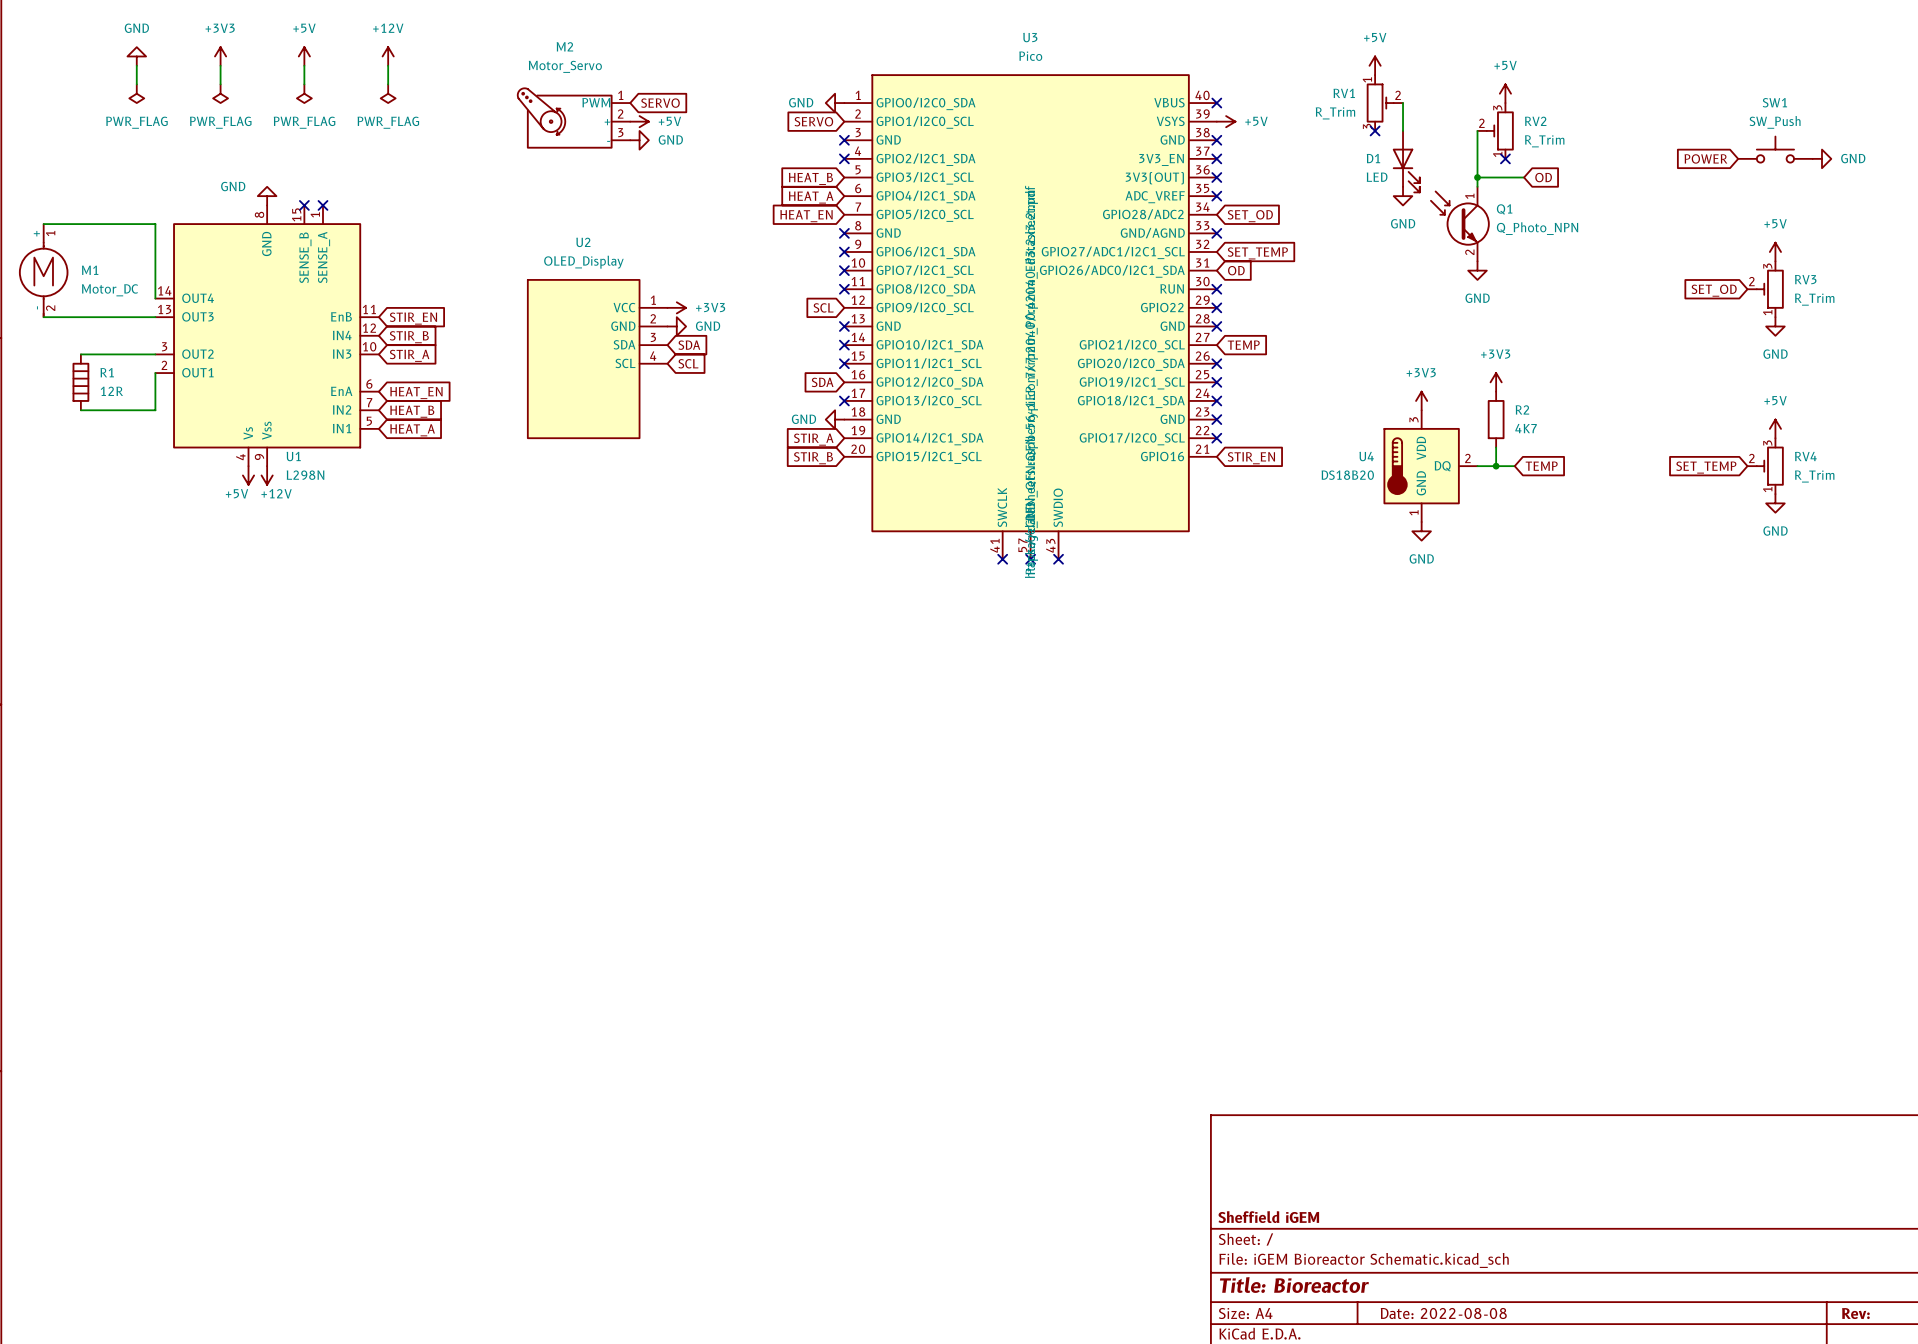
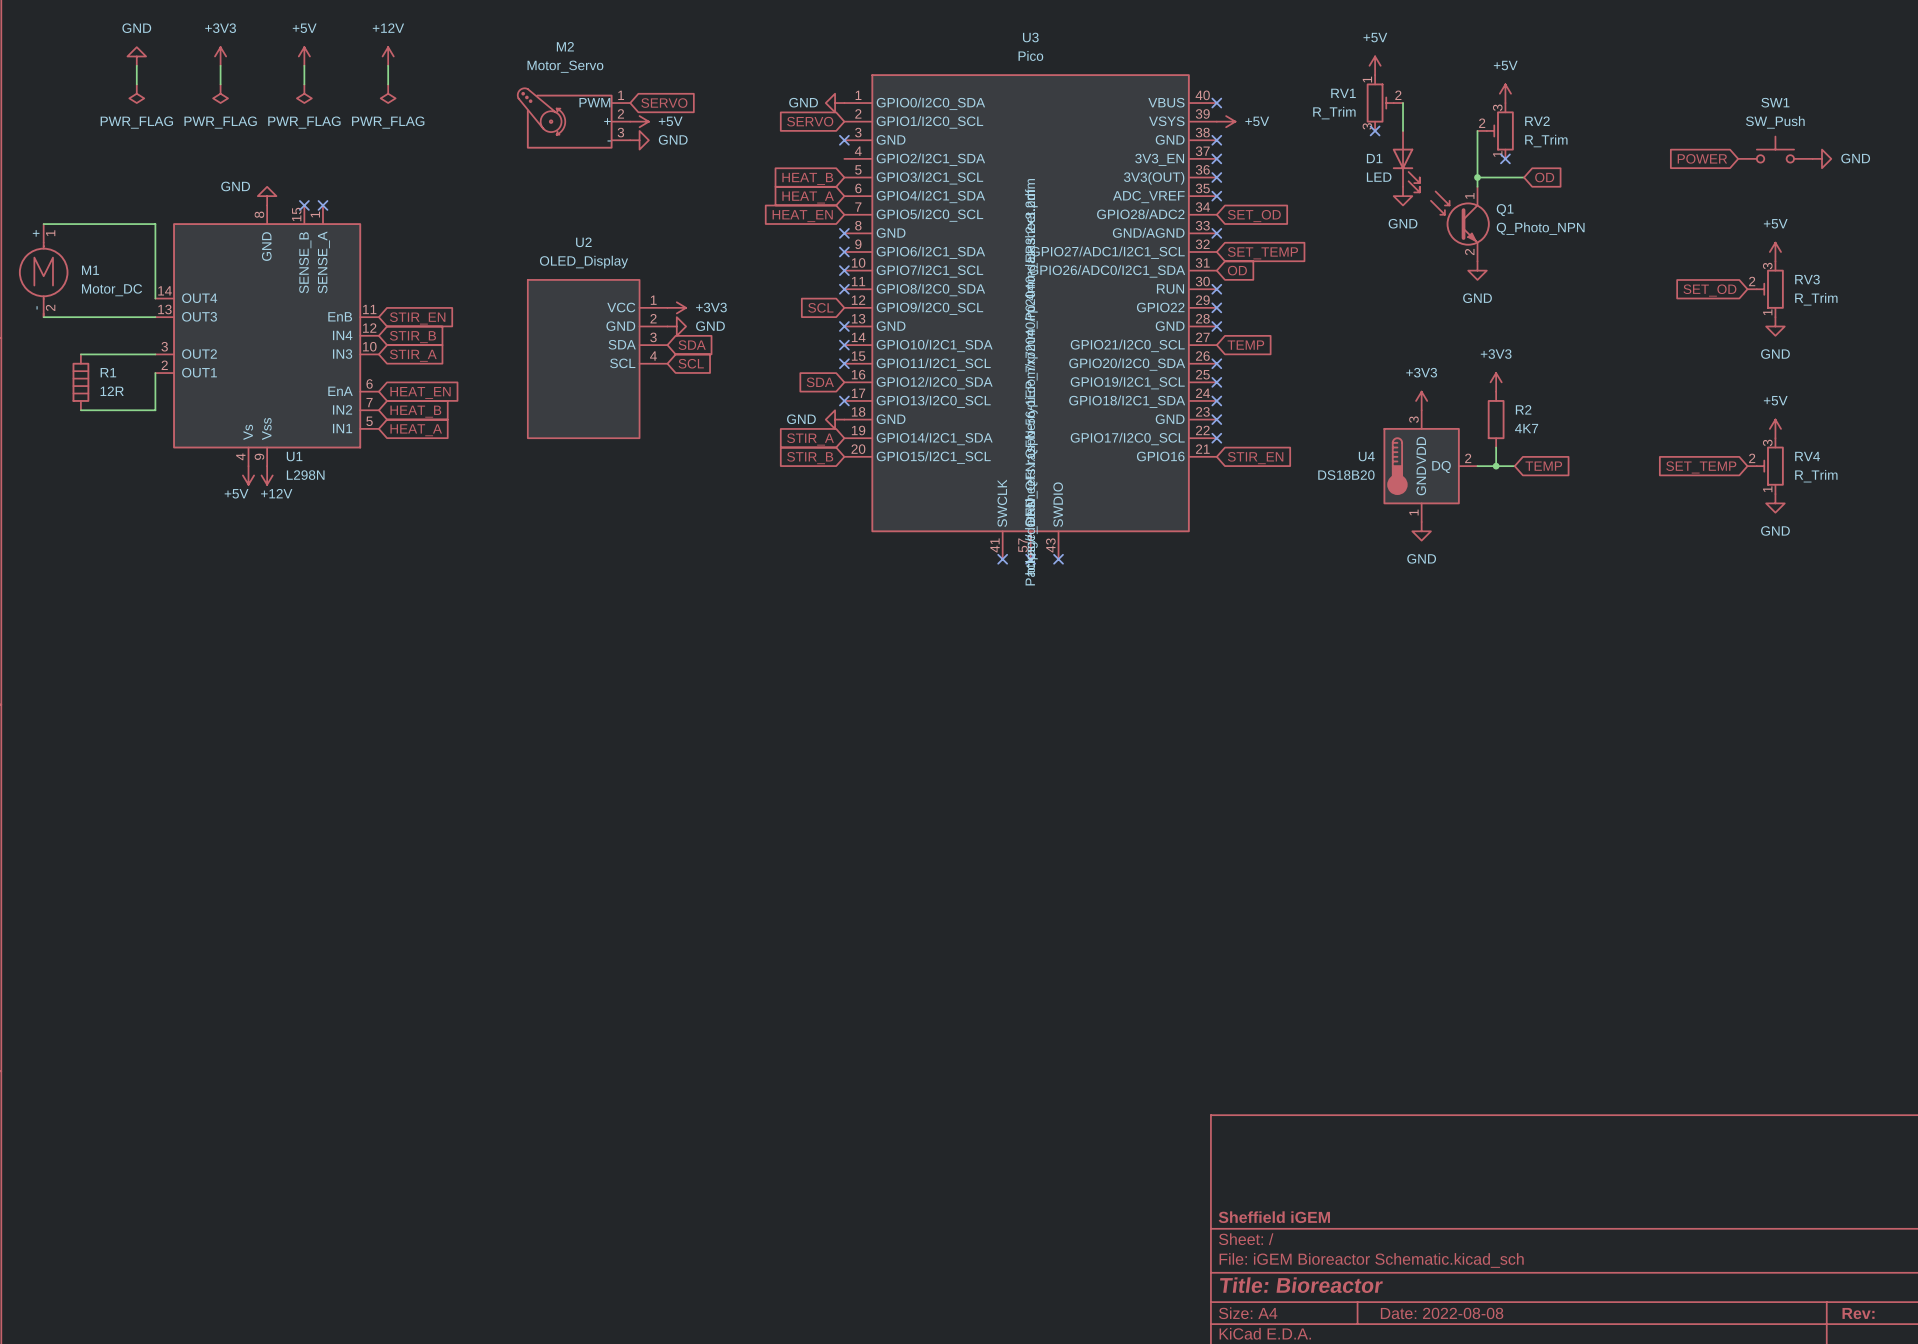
no-connect mark: (844, 158) -> none

